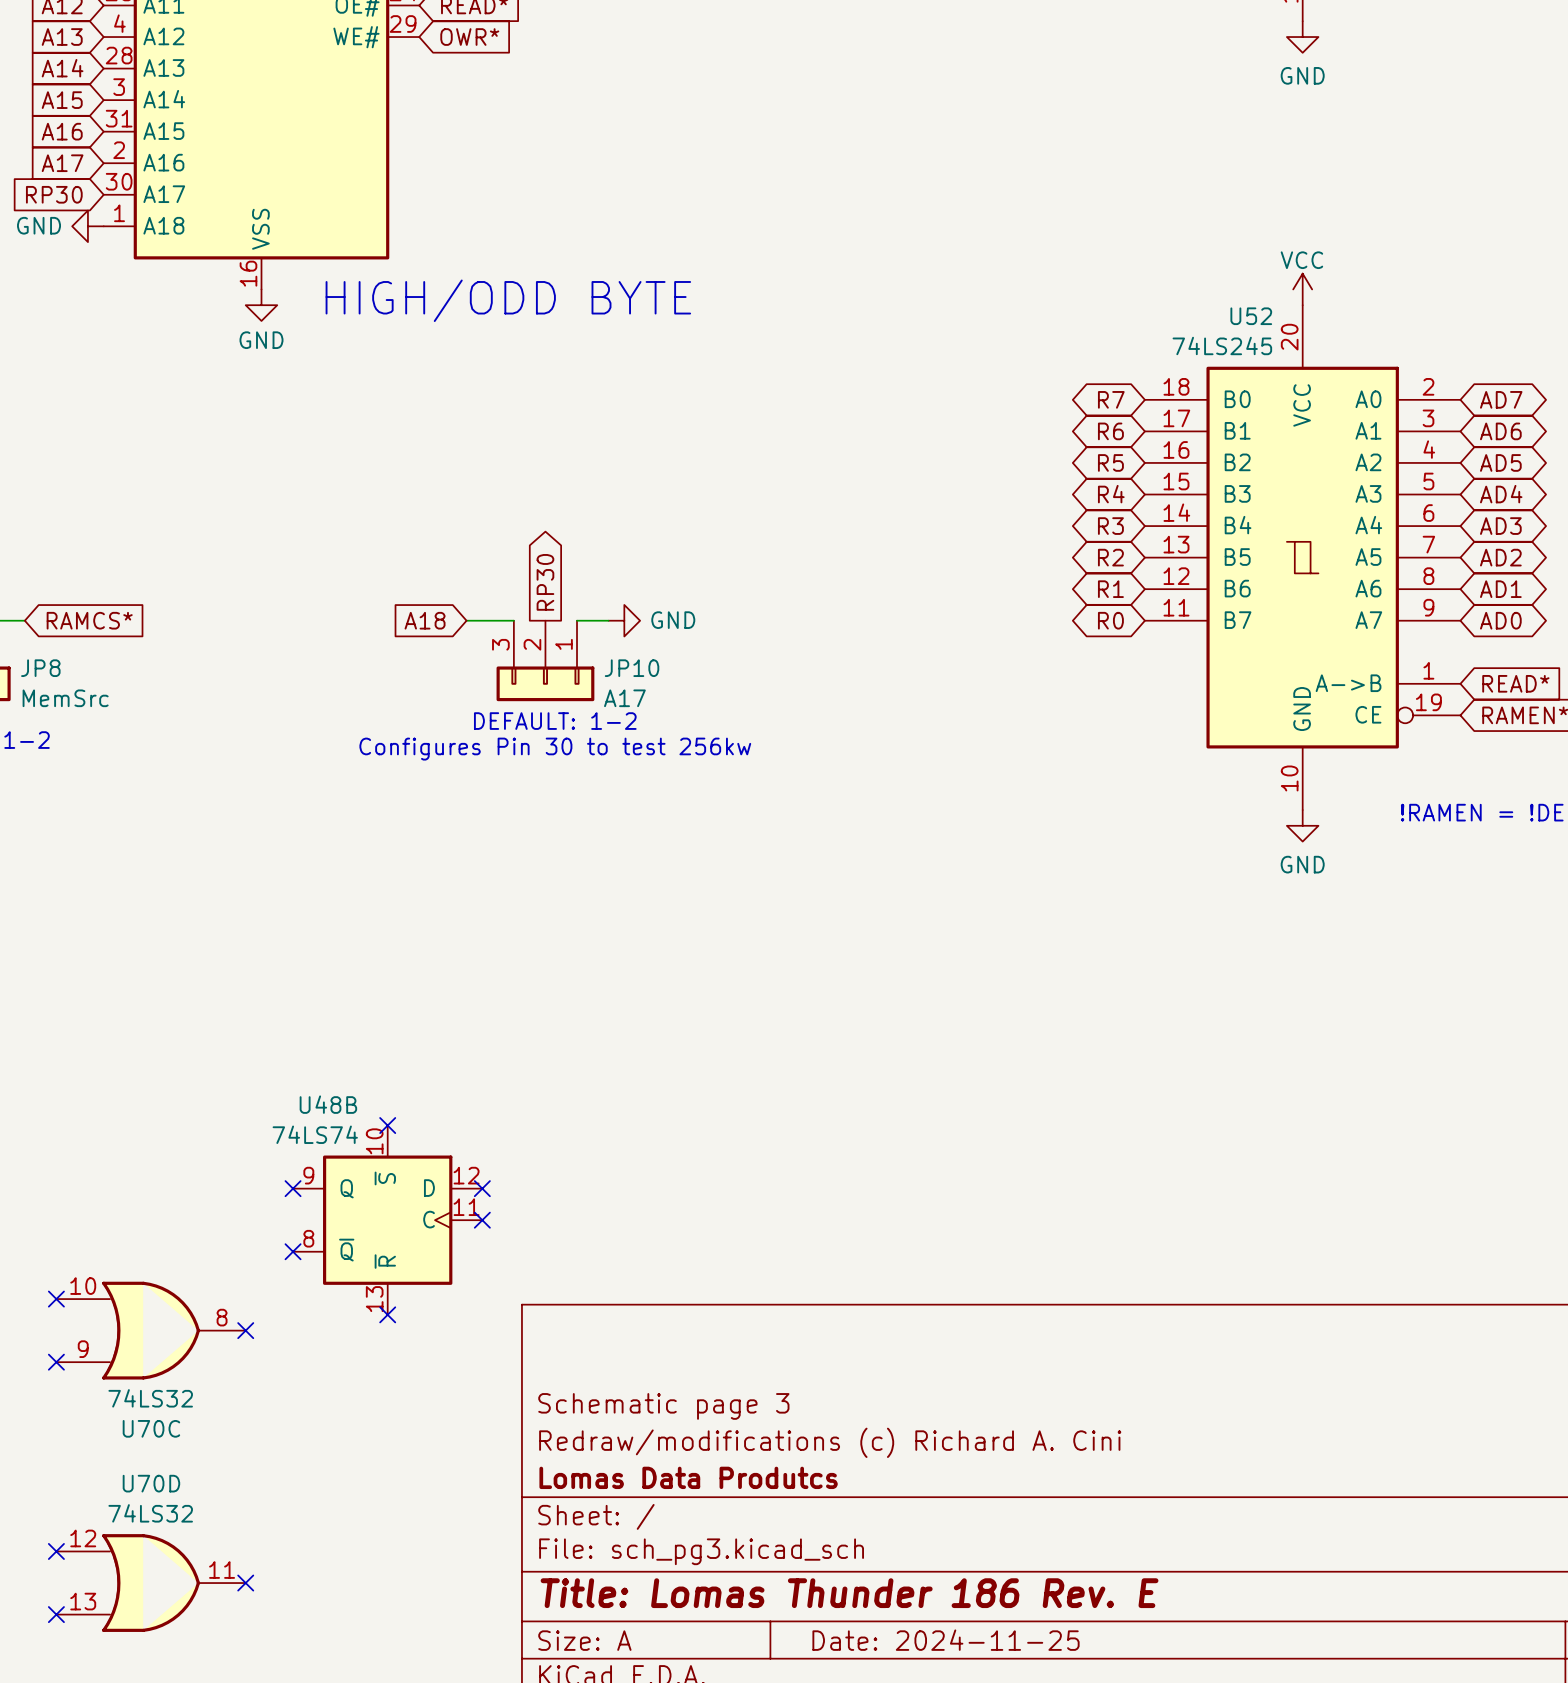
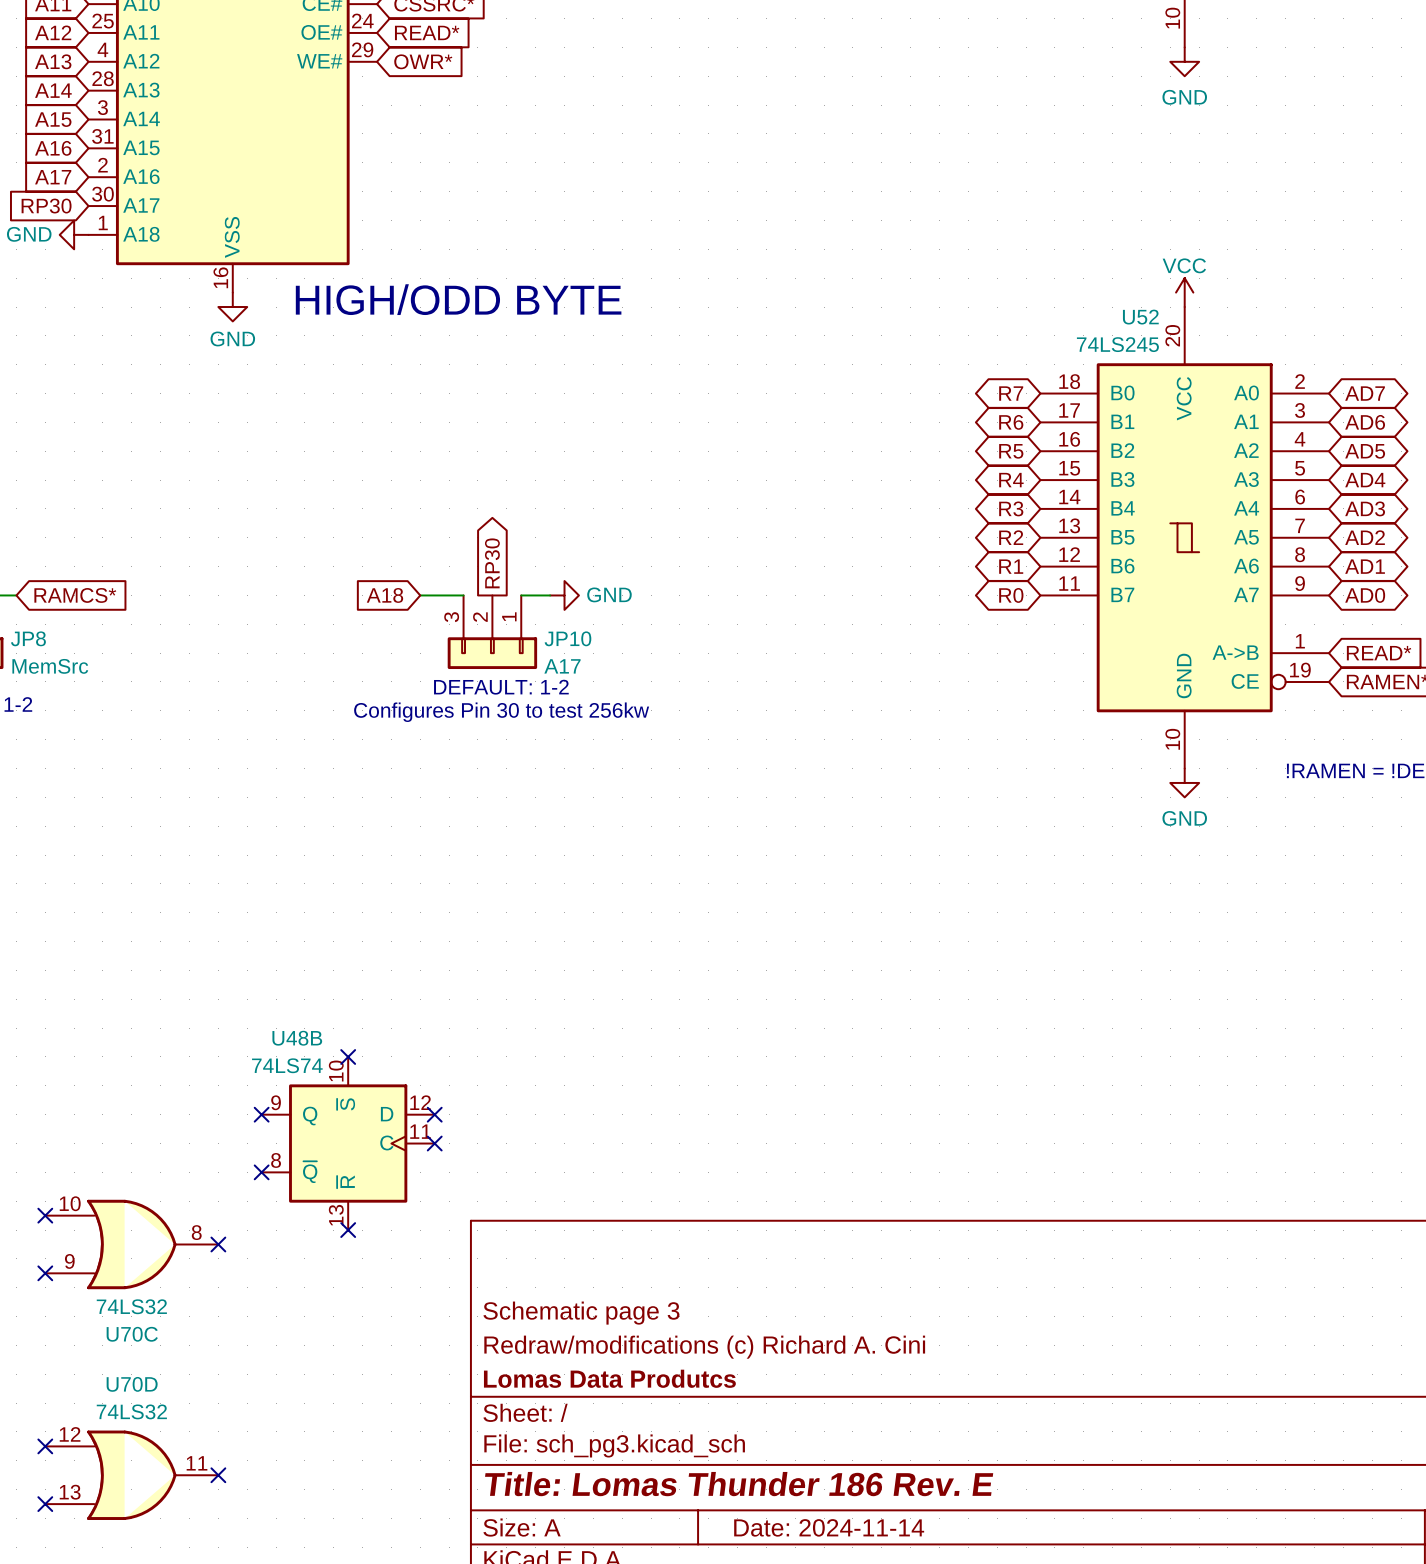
title block: Date: 2024-11-25 (946, 1640) -> Date: 2024-11-14 (829, 1527)

